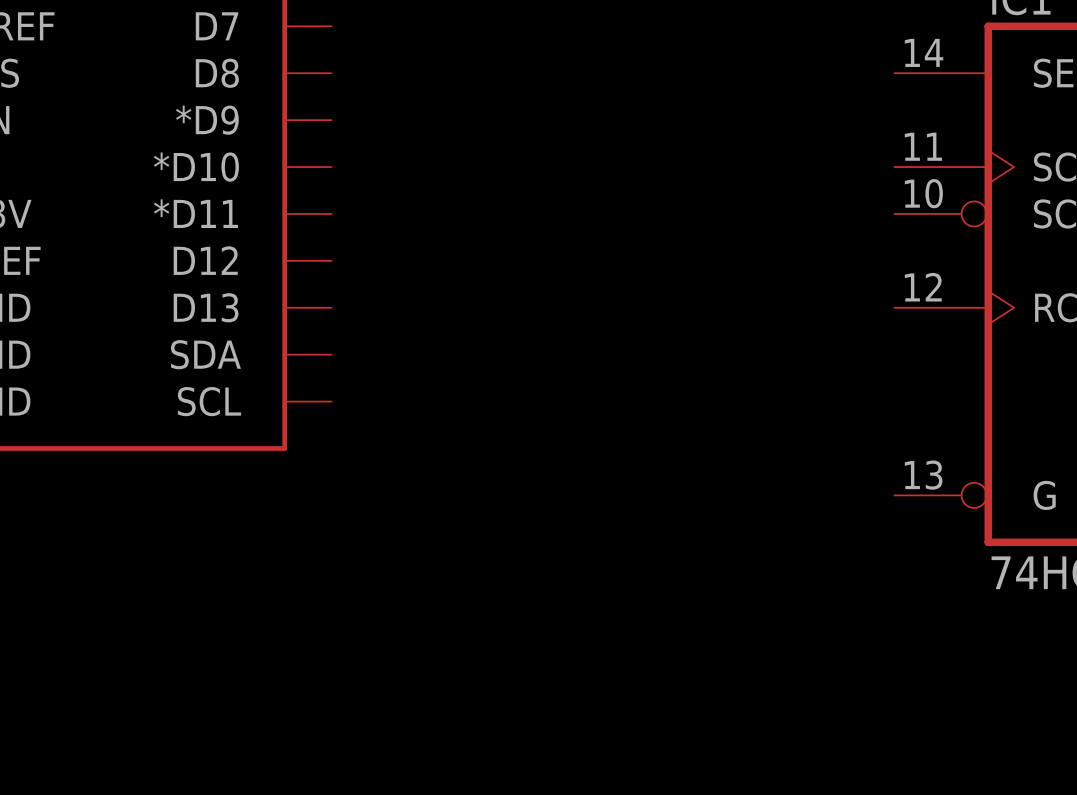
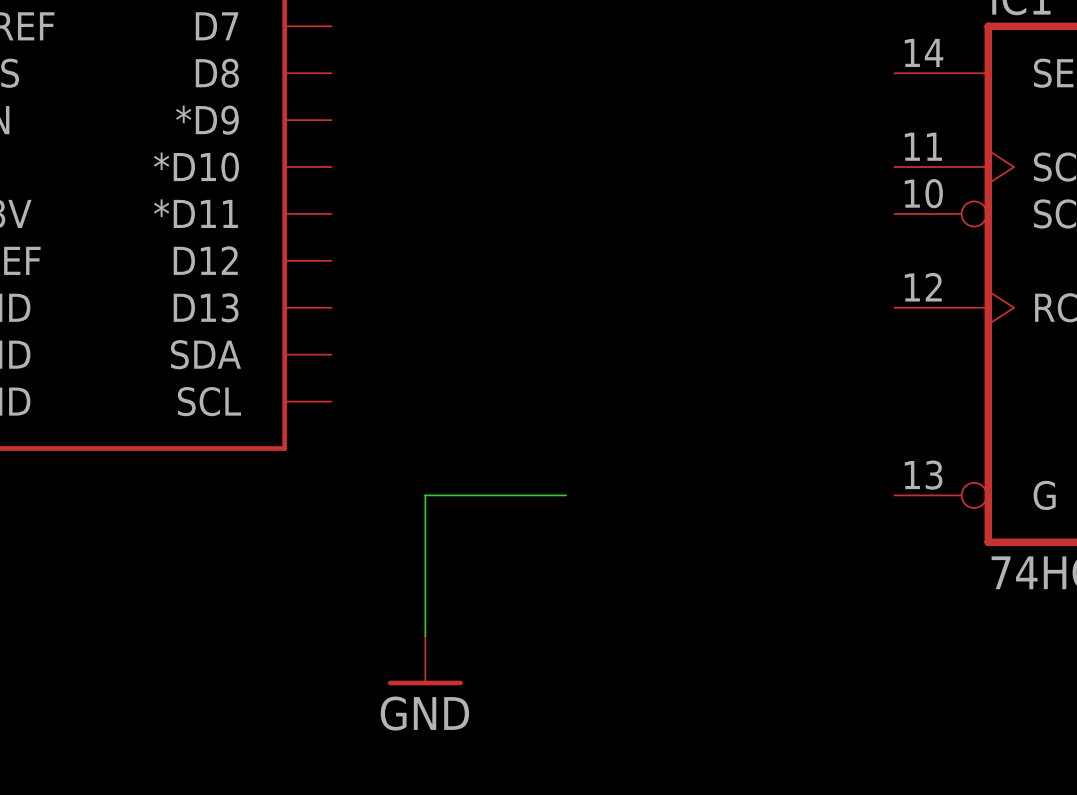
wire: none -> (566, 495) (425, 495) (425, 636)
power symbol: none -> GND (425, 660)

